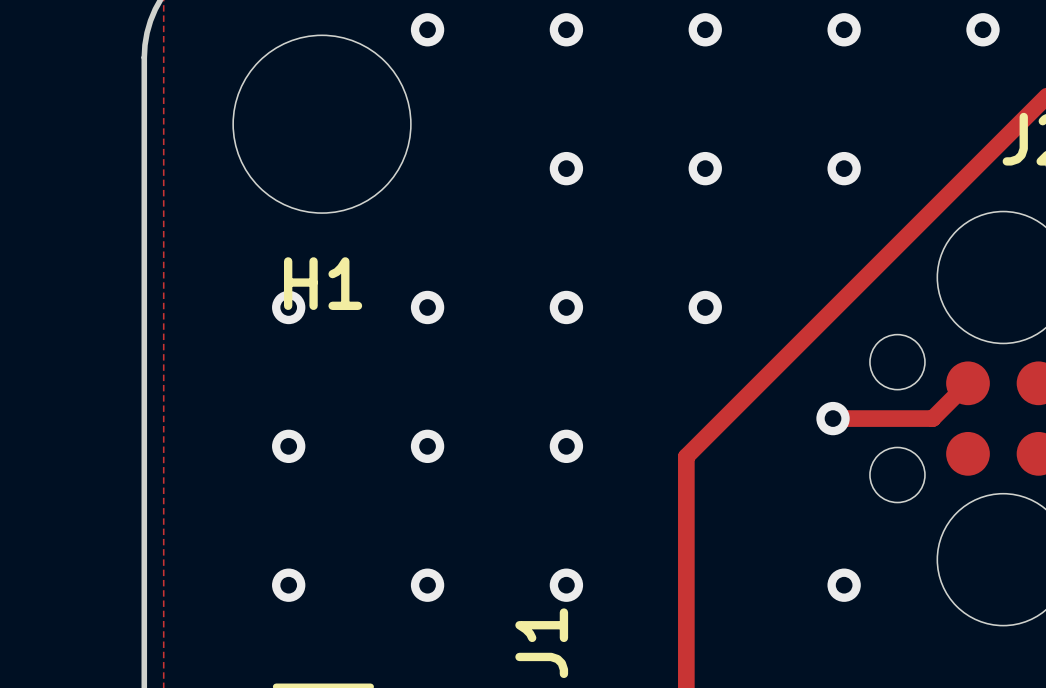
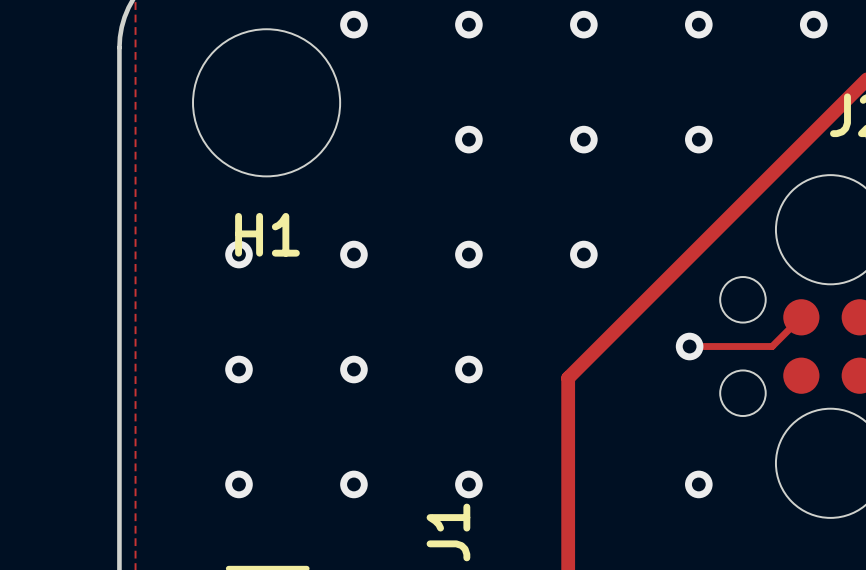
track width: thick (968, 383) (932, 418) (833, 418) -> thin (801, 317) (772, 346) (689, 346)

